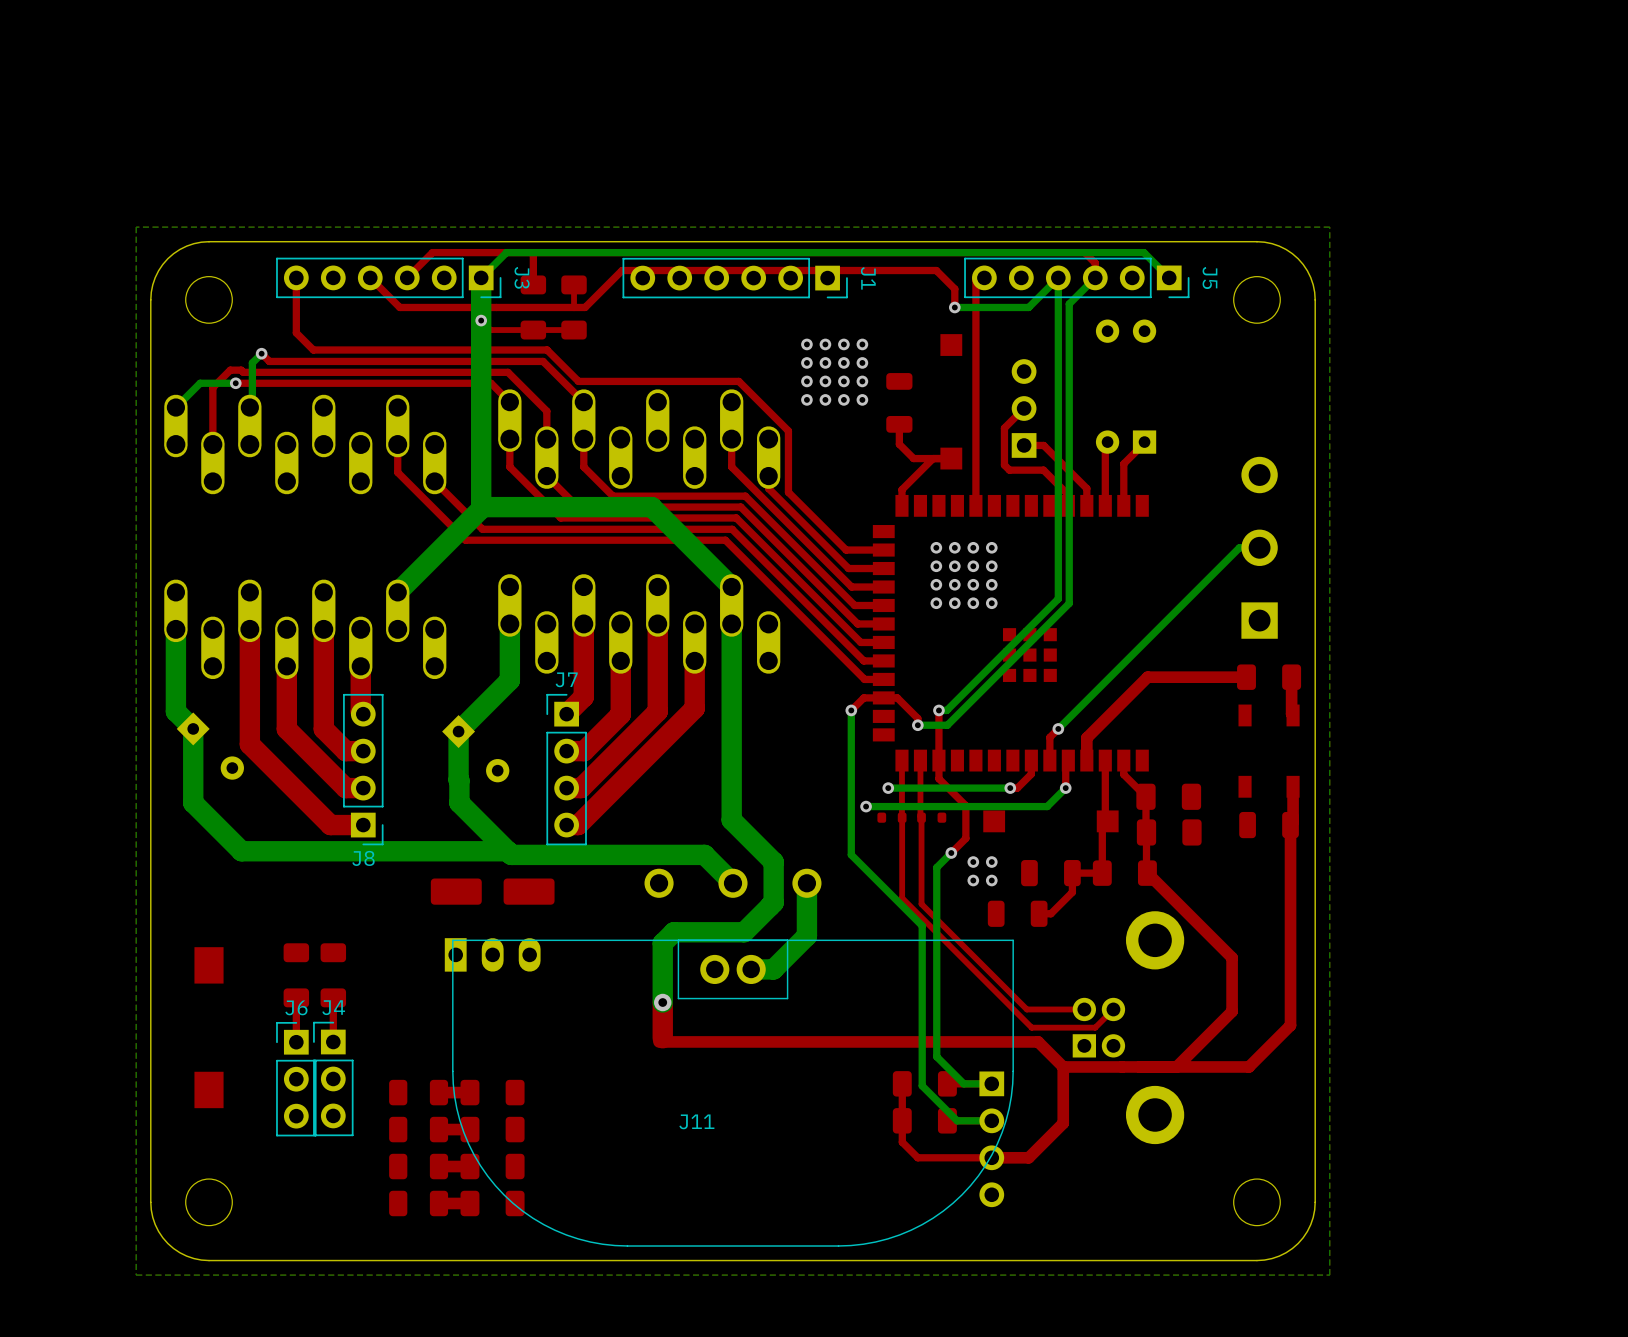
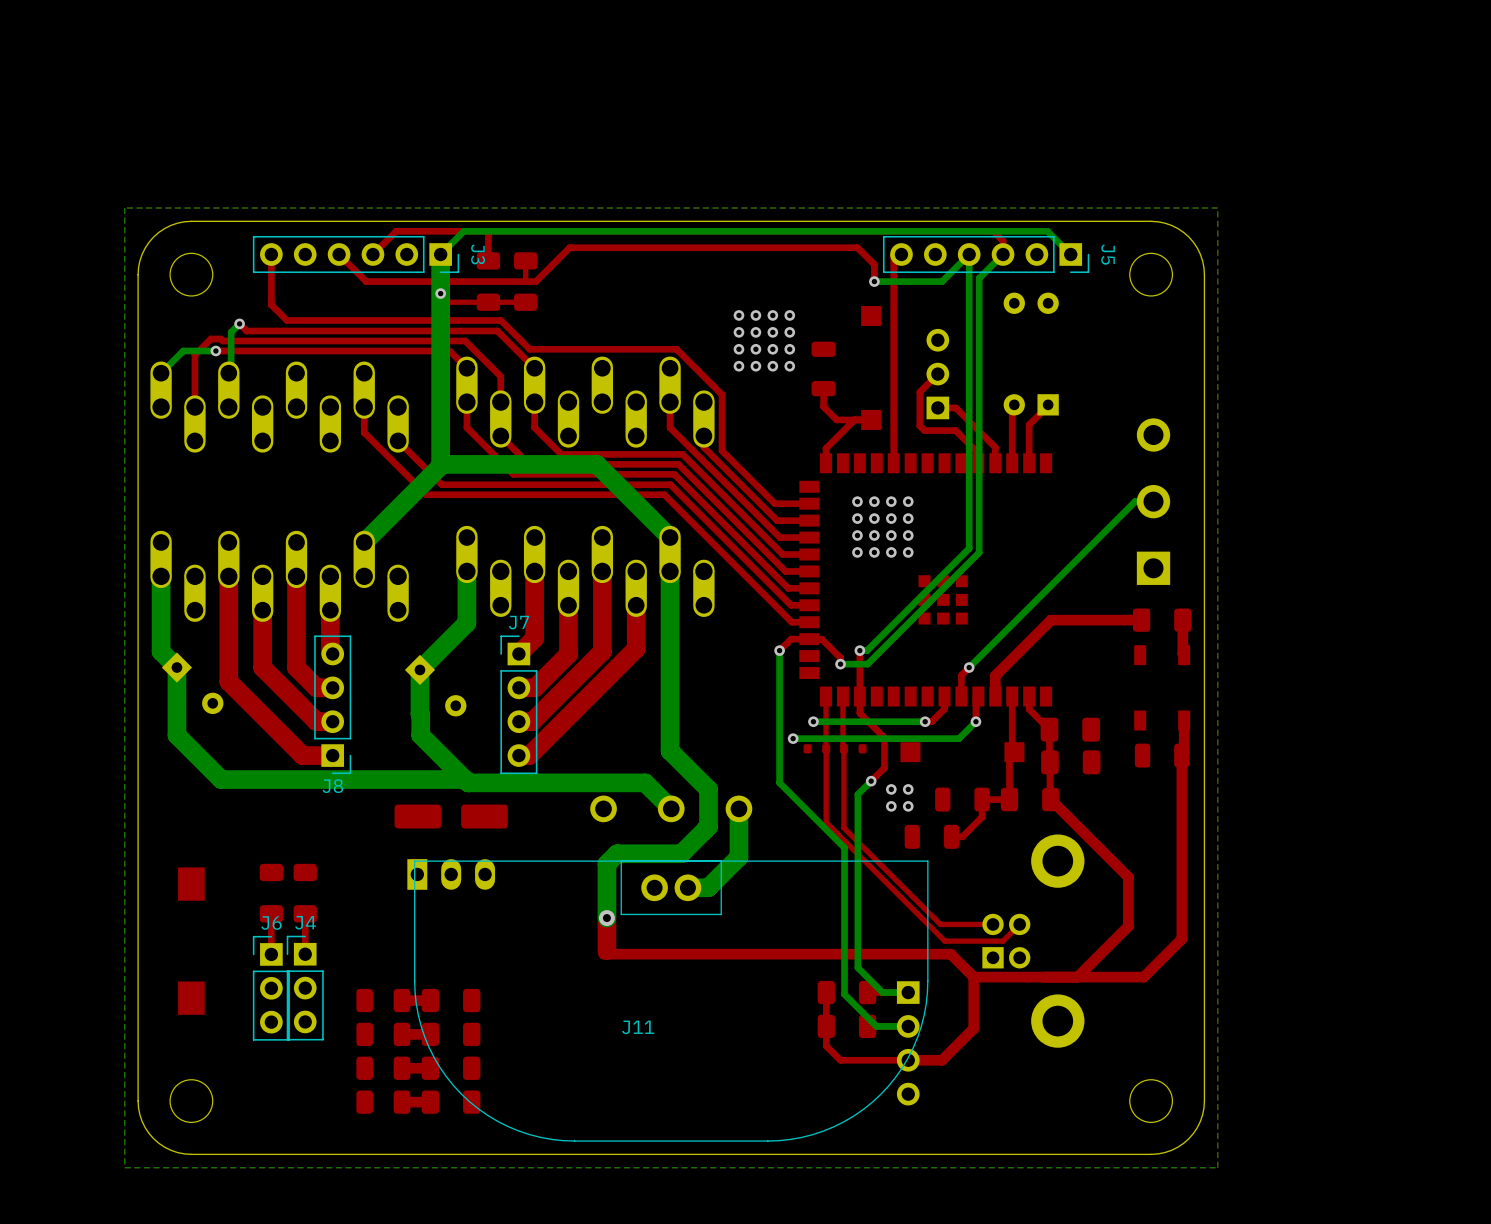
J1: (735, 278) -> none

